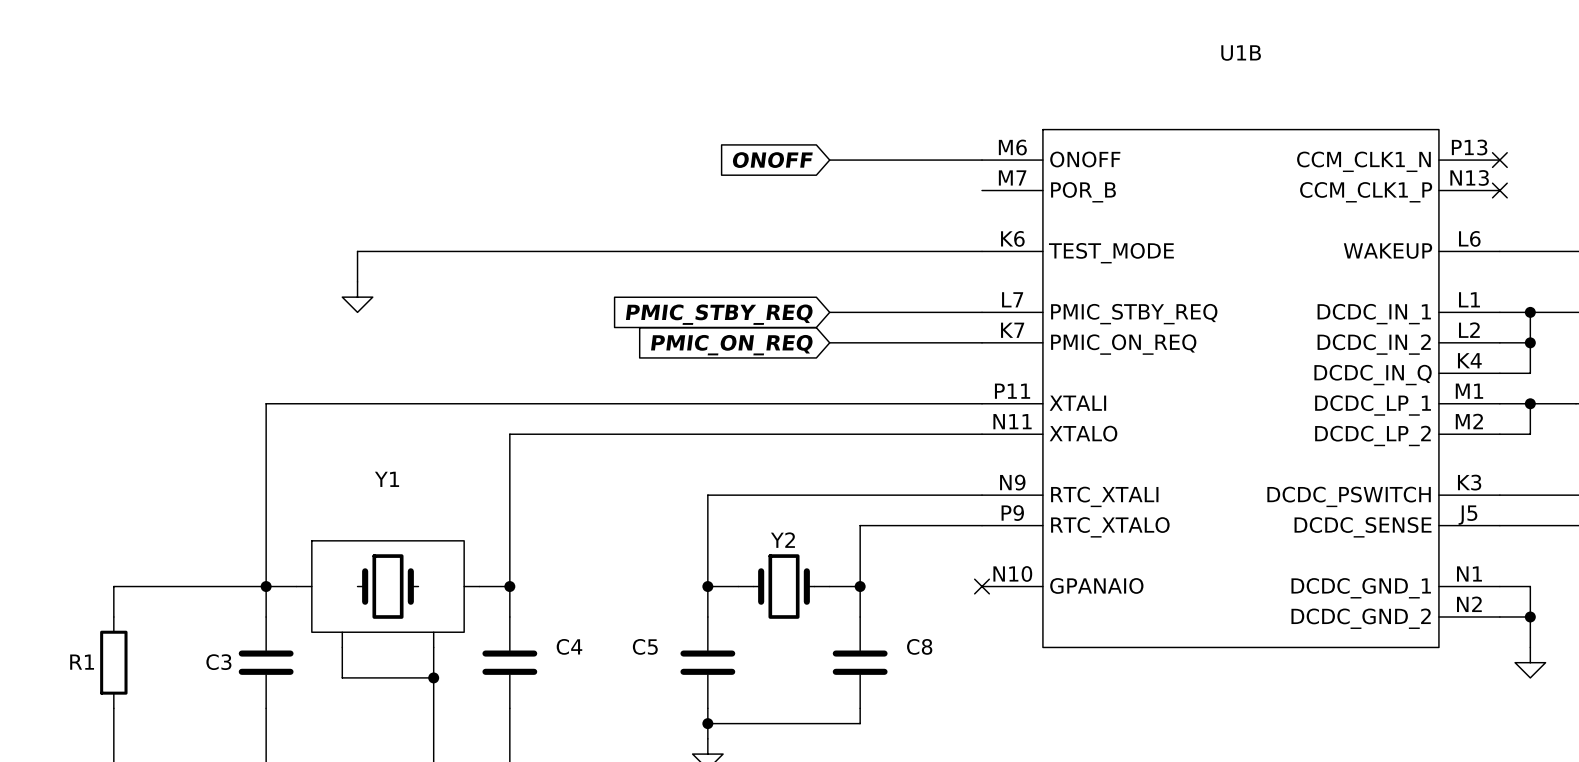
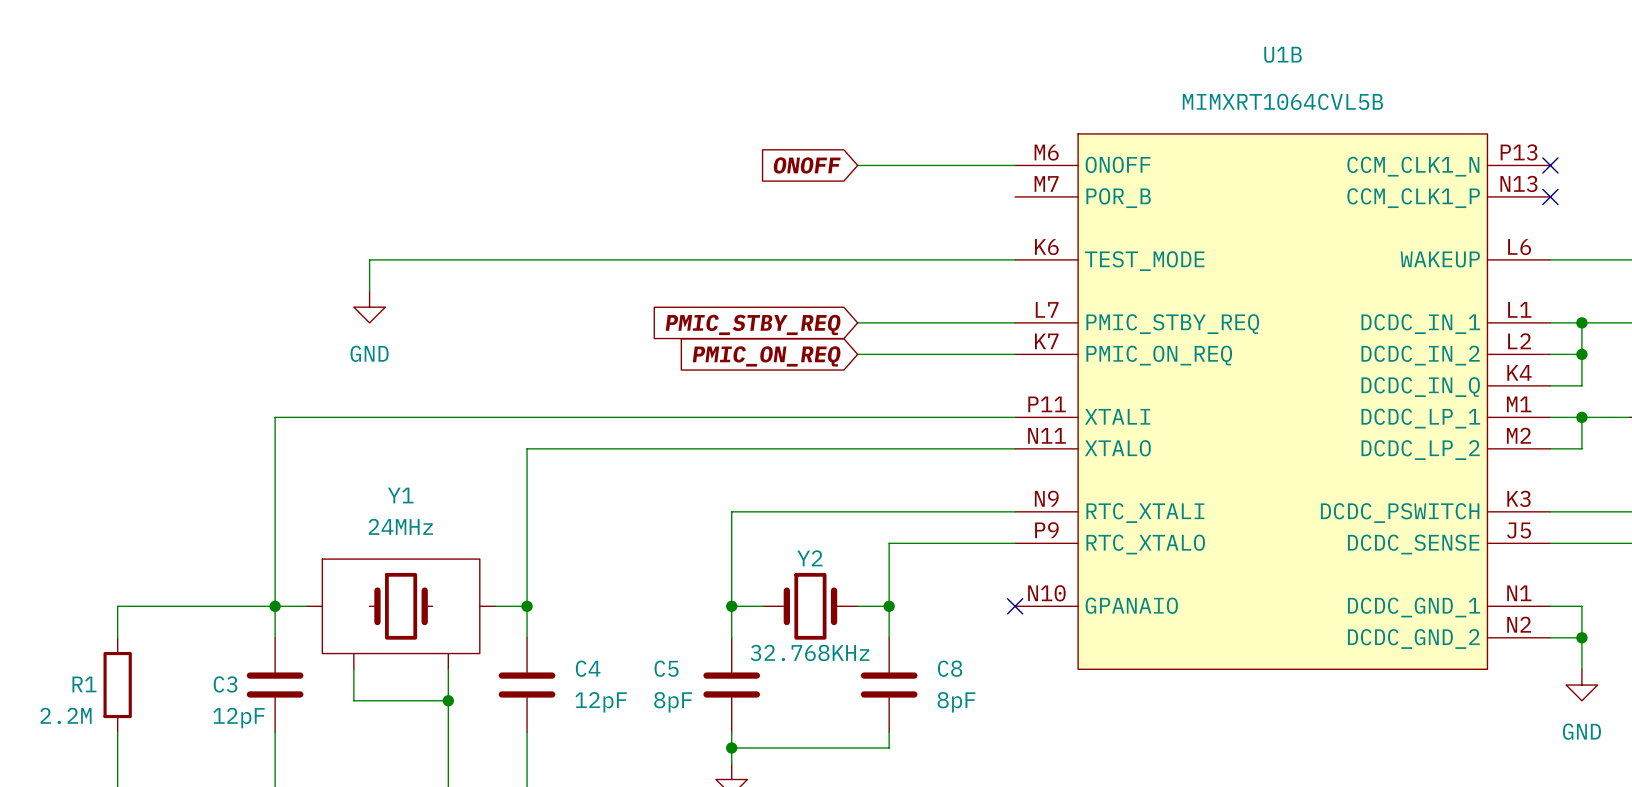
U1B value: none -> MIMXRT1064CVL5B (1282, 101)
power symbol text: none -> GND (369, 353)
Y1 value: none -> 24MHz (400, 526)
Y2 value: none -> 32.768KHz (810, 652)
C4 value: none -> 12pF (601, 702)
C5 value: none -> 8pF (673, 702)
C8 value: none -> 8pF (956, 702)
R1 value: none -> 2.2M (65, 715)
C3 value: none -> 12pF (239, 718)
power symbol text: none -> GND (1581, 731)

